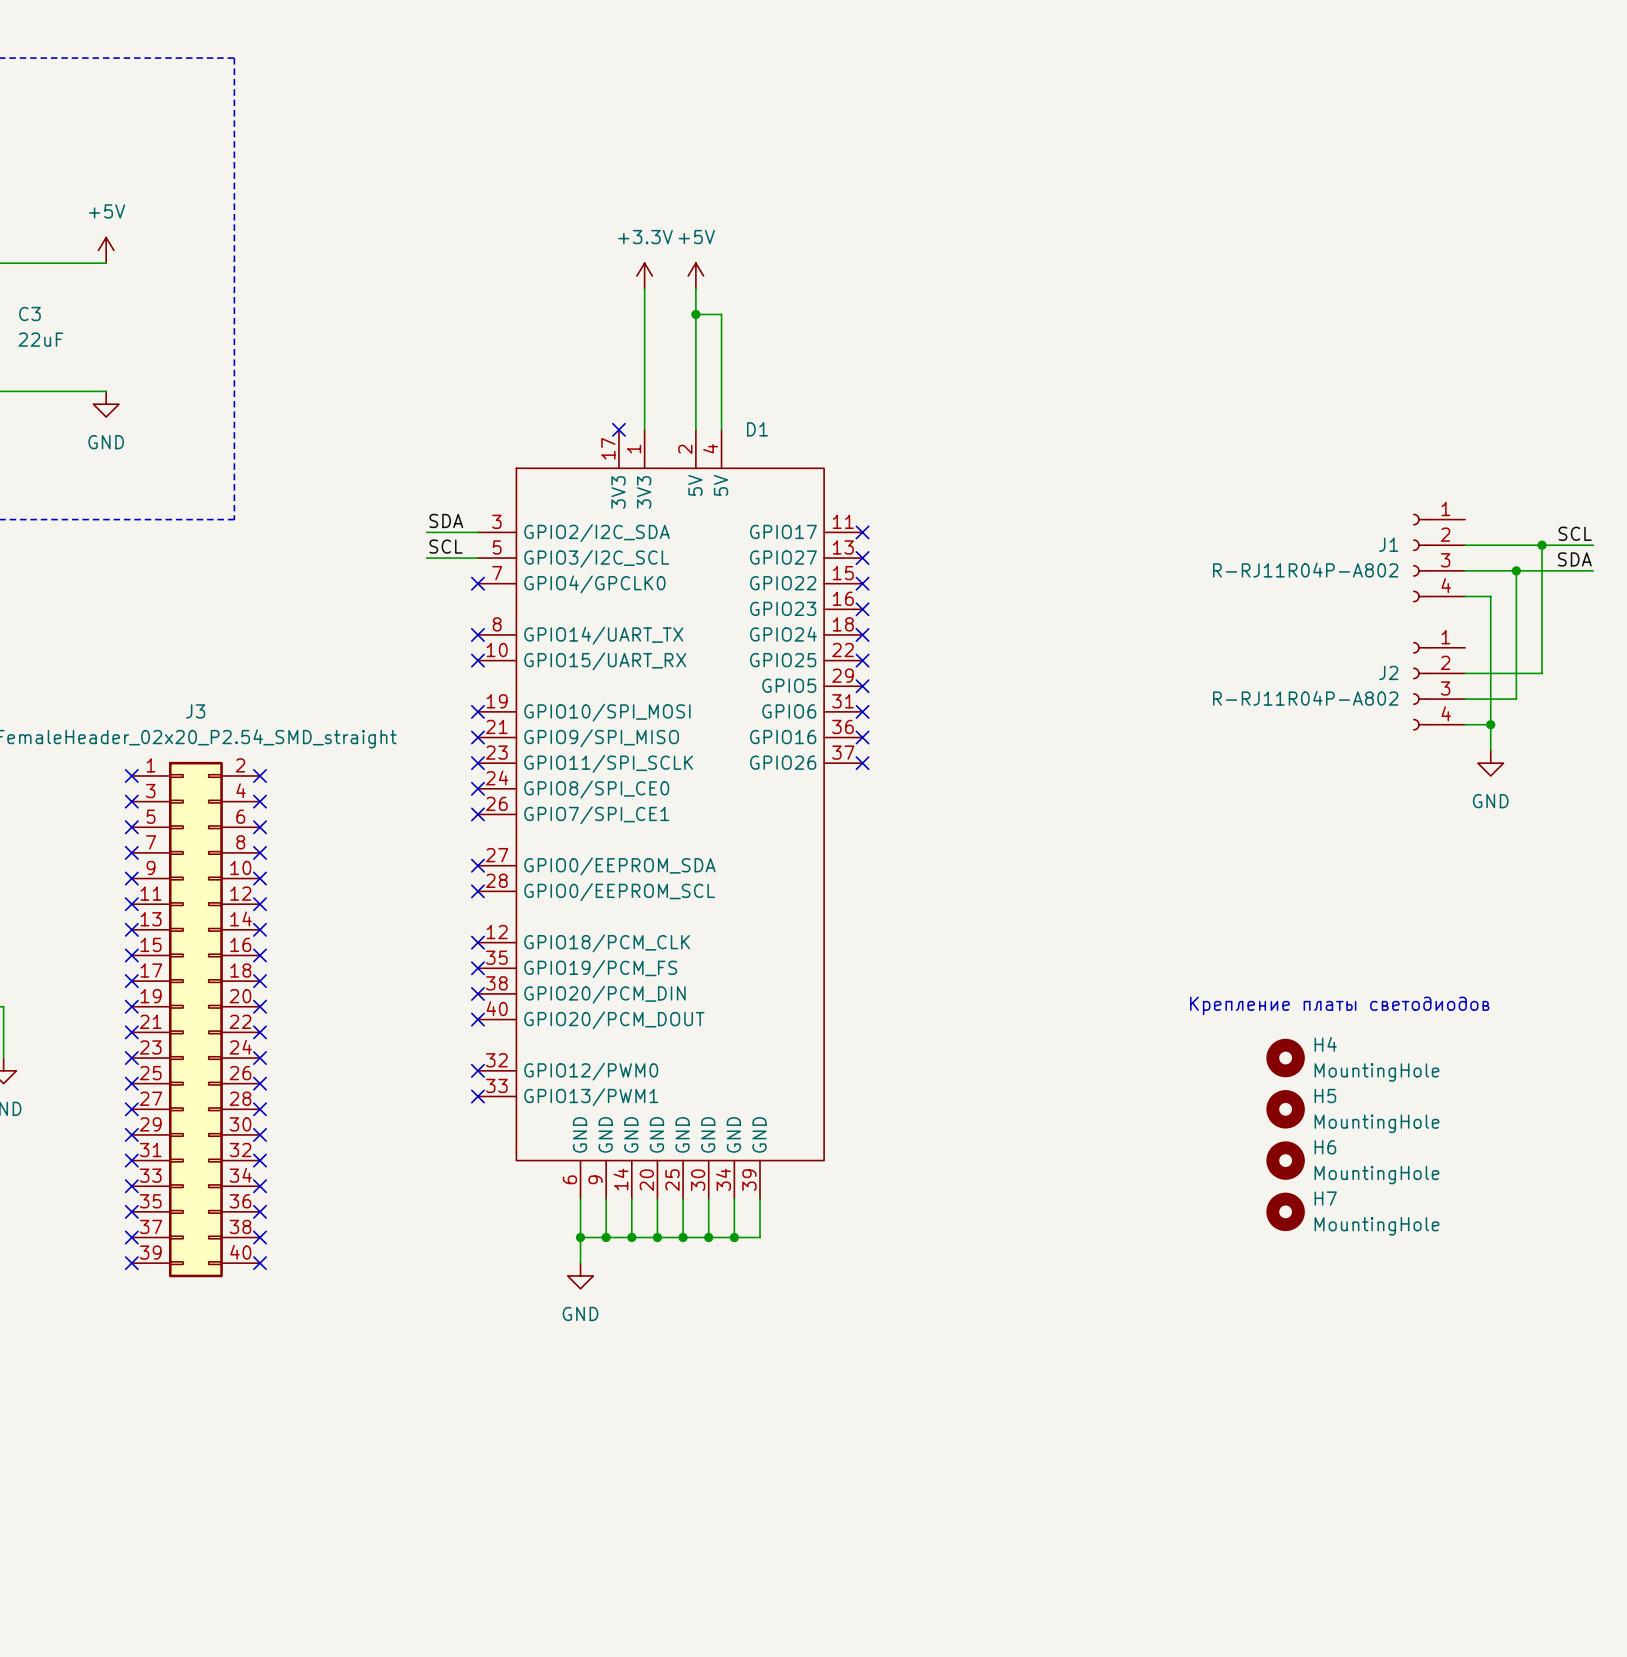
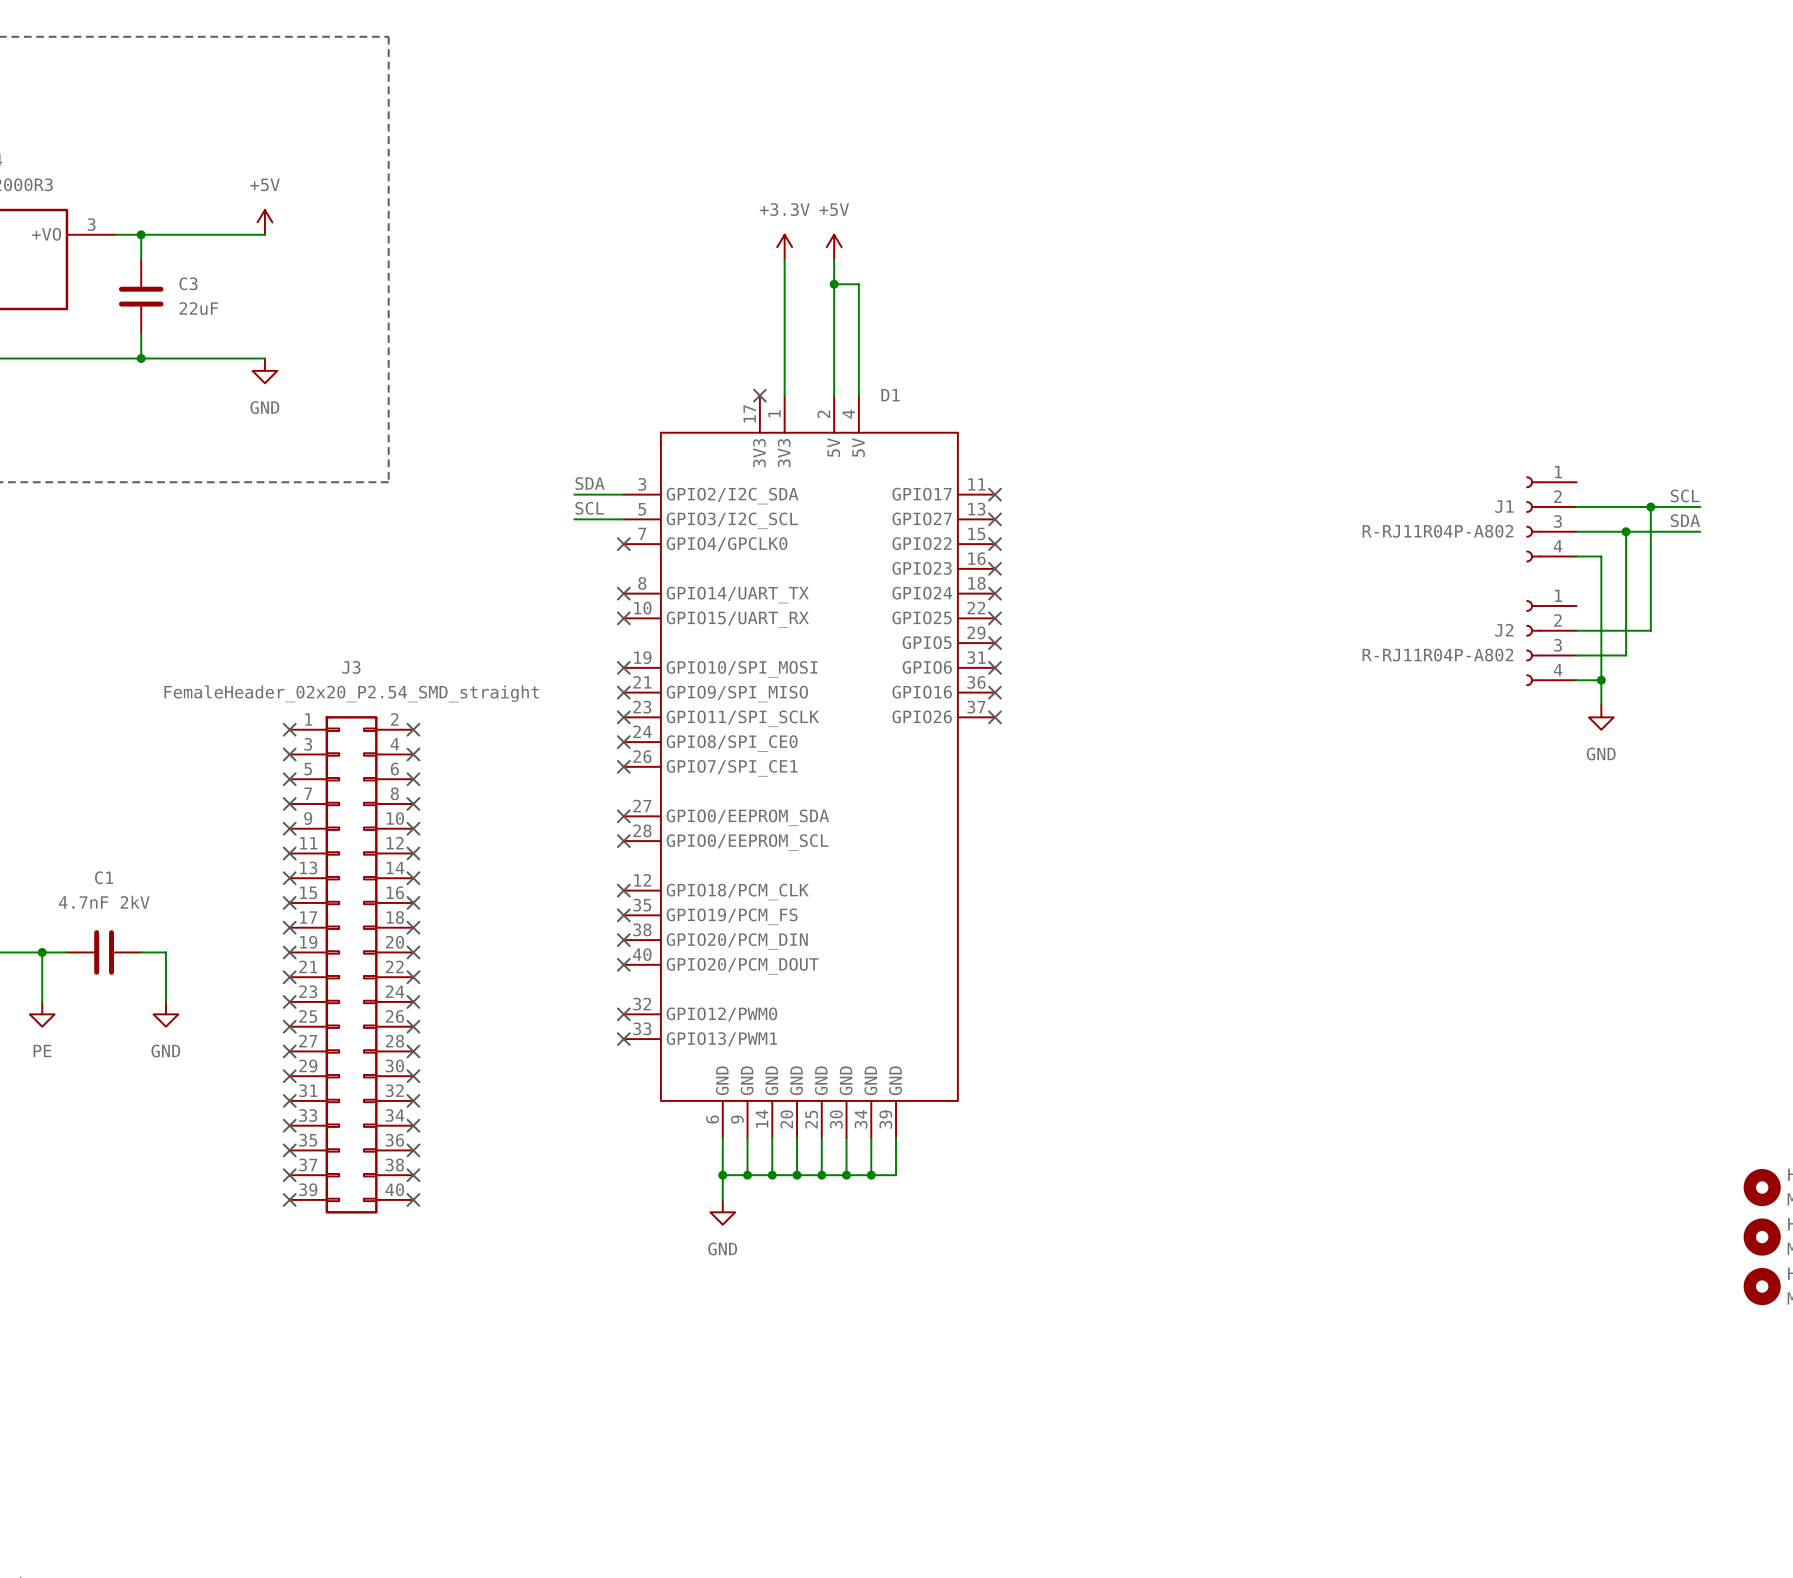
text: Крепление платы светодиодов (1339, 1005) -> none
H4: MountingHole (1285, 1058) -> none
H5: MountingHole (1285, 1109) -> none
H6: MountingHole (1285, 1160) -> none
H7: MountingHole (1285, 1211) -> none

